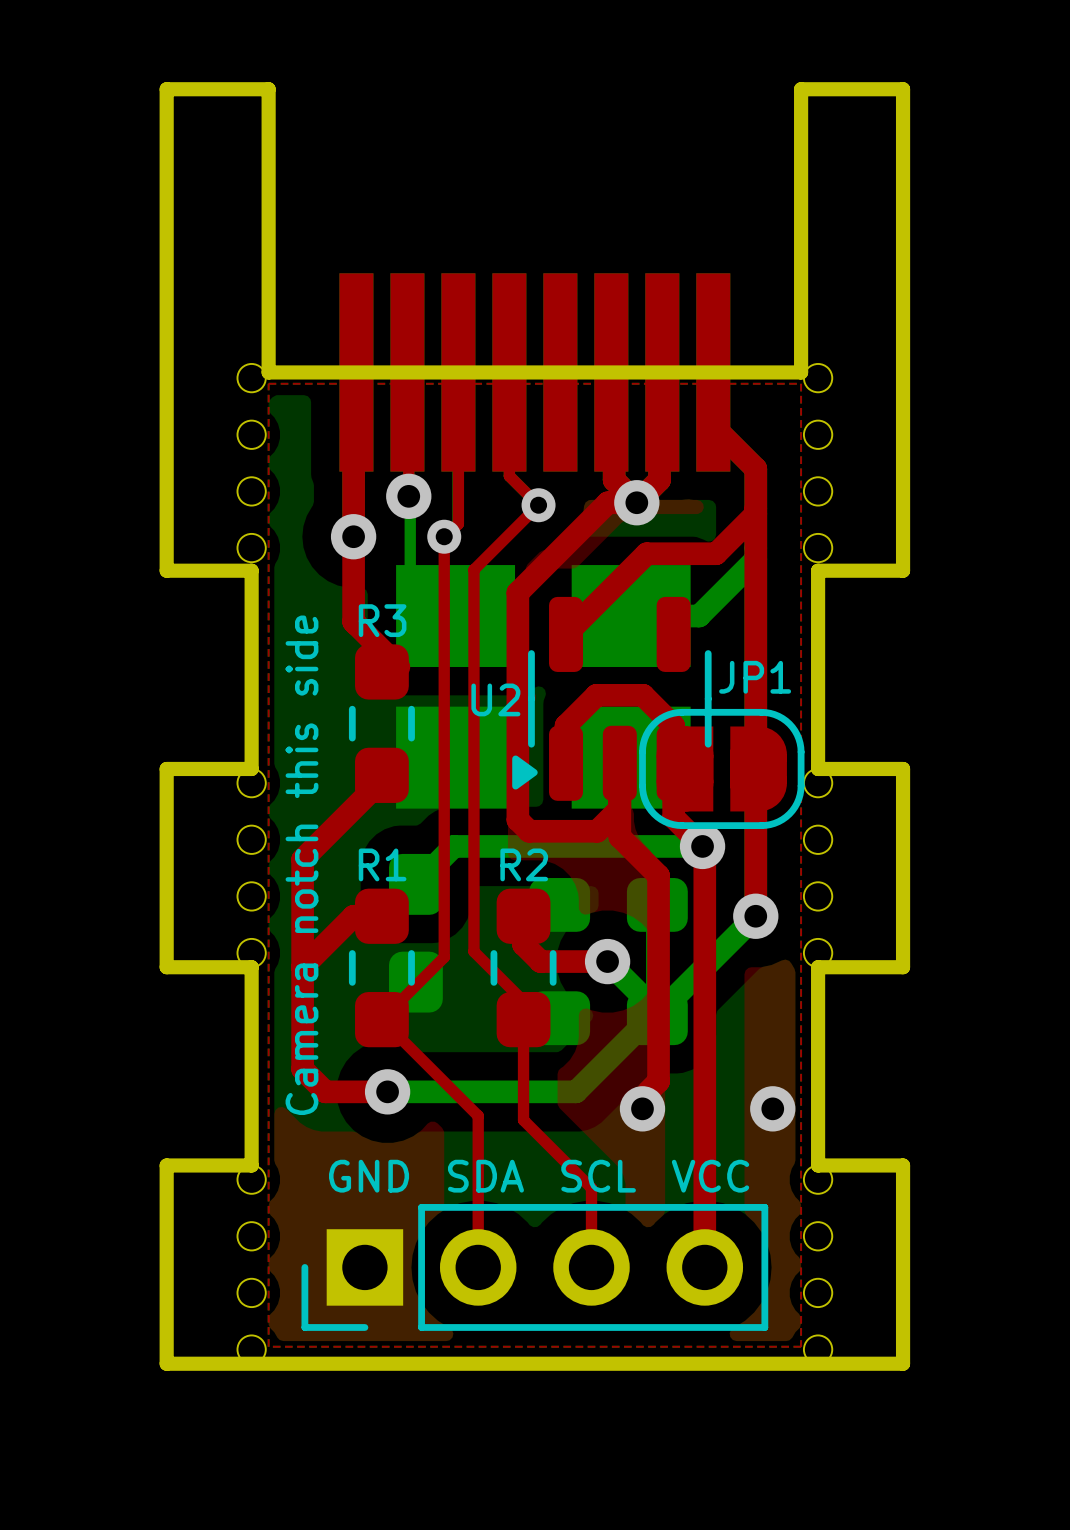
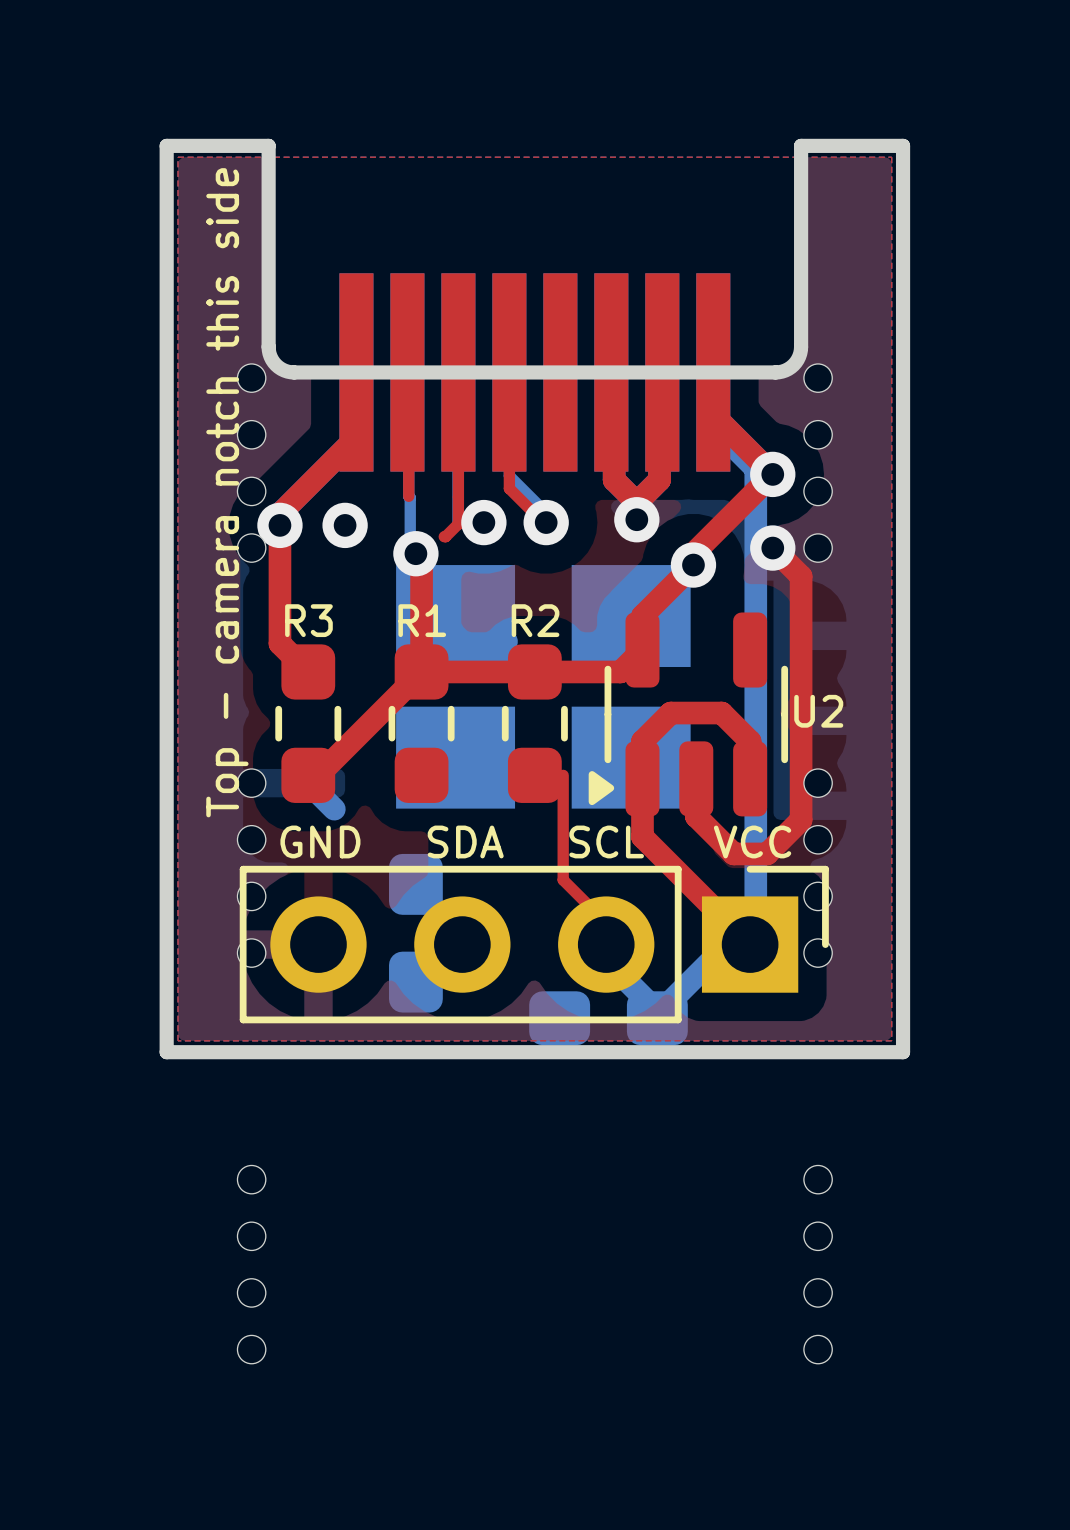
board edge: (166, 145) (166, 89) (268, 89) (268, 372) (801, 372) (801, 89) (903, 89) (903, 145) -> (166, 145) (268, 145)
board edge: none -> (801, 145) (903, 145)
top zone outline: none -> (178, 157) (178, 1040) (891, 1040) (891, 157) (178, 157)
part: none -> (534, 305)
part: (534, 372) -> none
top zone outline: (268, 383) (268, 1346) (801, 1346) (801, 383) (268, 383) -> none
top track: none -> (716, 389) (716, 417) (772, 474) (693, 553) (693, 565) (642, 616) (642, 650) (620, 671) (421, 671)
top track: (353, 406) (353, 621) (398, 667) -> none
top track: (713, 426) (755, 468) (755, 916) -> none
top track: none -> (353, 440) (279, 514) (279, 643) (308, 671)
via: none -> (772, 474)
top track: (509, 476) (538, 505) (473, 569) (473, 951) (523, 1001) -> (509, 476) (509, 488) (543, 522) (546, 522)
via size: [521, 488, 556, 523] -> [523, 499, 569, 546]
text: none -> Top - camera notch this side (227, 492)
via: (408, 496) -> none
top track: (636, 502) (607, 502) (517, 592) (517, 819) (529, 831) (597, 831) (619, 808) -> none
via position: (636, 502) -> (636, 519)
top track: (755, 514) (716, 553) (646, 553) (566, 634) -> none
via: none -> (483, 522)
via: none -> (279, 525)
via position: (353, 536) -> (345, 525)
via: (444, 536) -> none
top track: (444, 538) (444, 957) (381, 1019) (478, 1115) (478, 1267) -> none
top track: none -> (772, 548) (801, 576) (801, 819) (767, 853) (733, 853) (696, 816) (696, 778)
via: none -> (772, 548)
top track: none -> (415, 553) (421, 559) (421, 671)
via: none -> (415, 553)
bottom track: (755, 559) (699, 616) (631, 616) -> none
via: none -> (693, 565)
board edge: (166, 570) (251, 570) (251, 768) (166, 768) -> (166, 570) (166, 768)
board edge: (903, 570) (818, 570) (818, 768) (903, 768) -> (903, 570) (903, 768)
top track: none -> (421, 671) (318, 775) (308, 775)
U2 position: (611, 698) -> (688, 714)
U2 name position: U2 (495, 699) -> U2 (818, 711)
R3 position: (381, 723) -> (308, 723)
top track: (566, 763) (566, 725) (596, 695) (643, 695) (673, 725) (673, 817) (704, 848) (704, 1267) -> none
top track: (619, 763) (619, 836) (658, 875) (658, 1081) (648, 1091) -> none
JP1: (721, 768) -> none
top track: none -> (563, 775) (563, 879) (622, 938)
top track: none -> (750, 778) (750, 741) (721, 713) (670, 713) (642, 741) (642, 836) (750, 944)
top track: (381, 780) (302, 859) (302, 1069) (325, 1091) (387, 1091) -> none
bottom track: none -> (319, 794) (334, 809)
bottom track: (702, 846) (453, 846) (415, 884) -> none
via: (702, 846) -> none
text: Camera notch this side (301, 865) -> none
part: (608, 904) -> none
top track: (381, 916) (353, 916) (302, 967) -> none
top track: (523, 916) (523, 944) (540, 961) (607, 961) -> none
via: (755, 916) -> none
part: none -> (534, 944)
via: (607, 961) -> none
board edge: (166, 967) (251, 967) (251, 1165) (166, 1165) (166, 1363) (903, 1363) (903, 1165) (818, 1165) (818, 967) (903, 967) -> (166, 967) (166, 1052) (903, 1052) (903, 967)
R1 position: (381, 967) -> (421, 723)
R2 position: (523, 967) -> (534, 723)
bottom track: (649, 1018) (576, 1091) (387, 1091) -> none
top track: (523, 1019) (523, 1120) (591, 1188) (591, 1267) -> none
via: (387, 1091) -> none
via: (642, 1108) -> none
via: (772, 1108) -> none
text position: GND (369, 1176) -> GND (320, 841)
text position: SDA (485, 1176) -> SDA (465, 841)
text position: SCL (598, 1176) -> SCL (606, 841)
text position: VCC (710, 1176) -> VCC (752, 841)
part: (534, 1267) -> none

